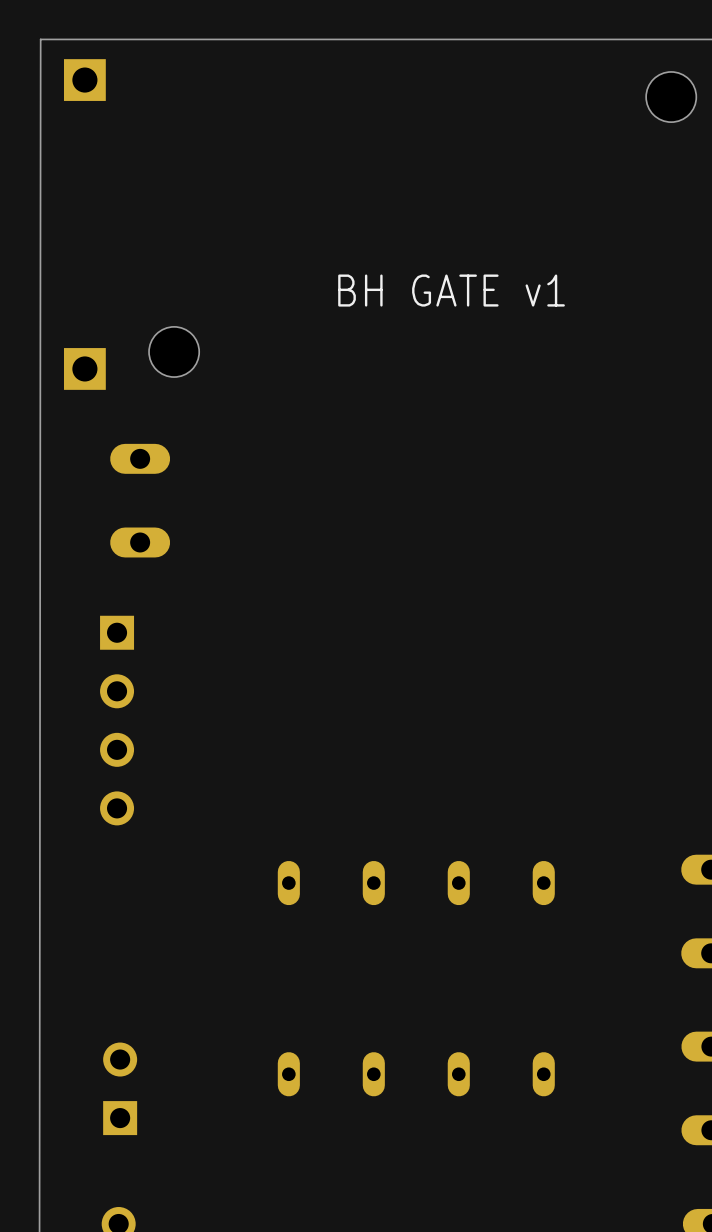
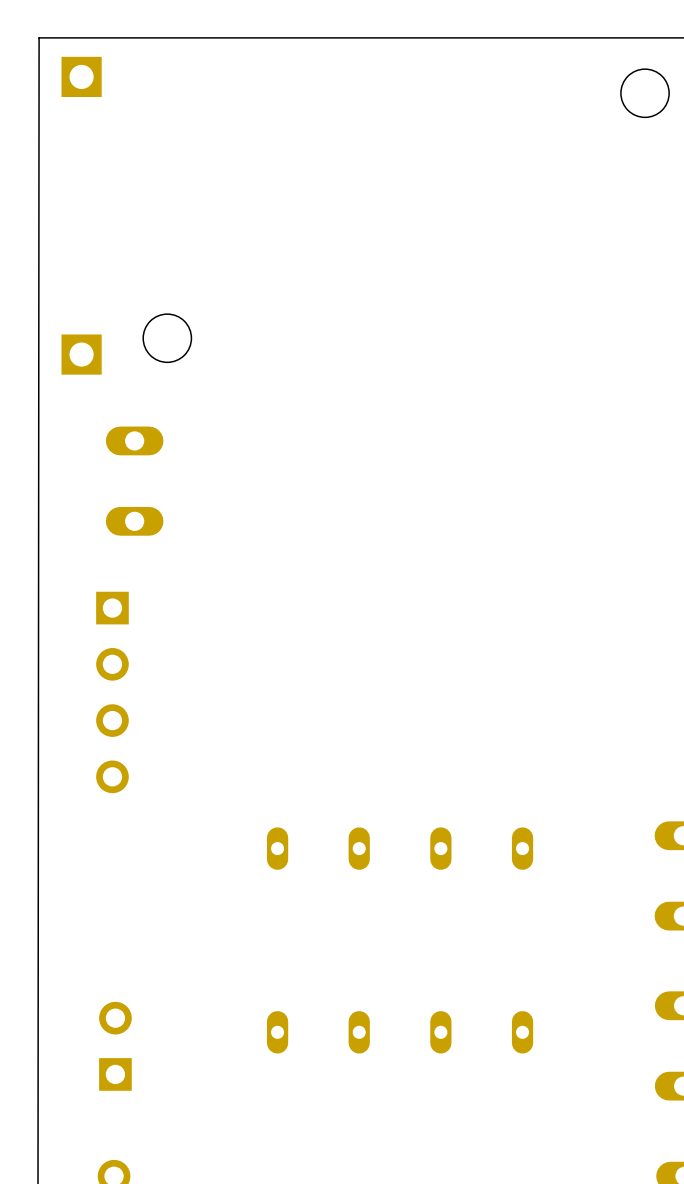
text: BH GATE v1 (451, 290) -> none

